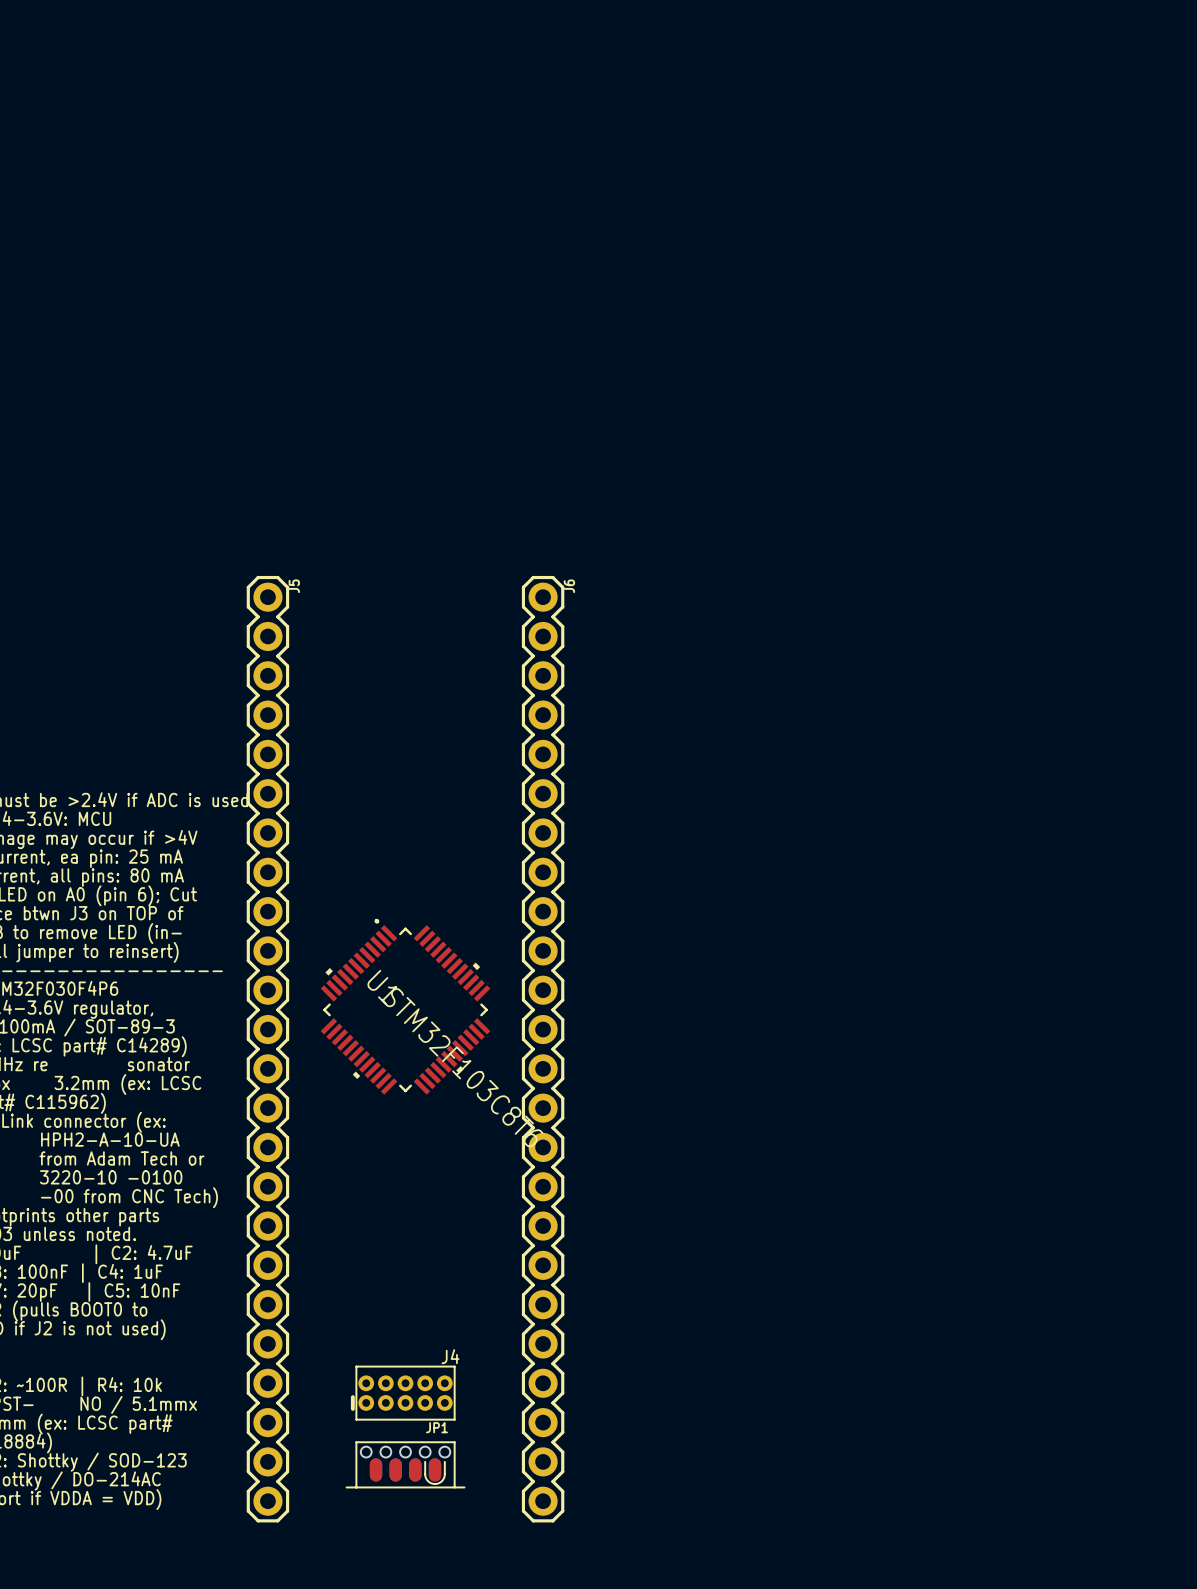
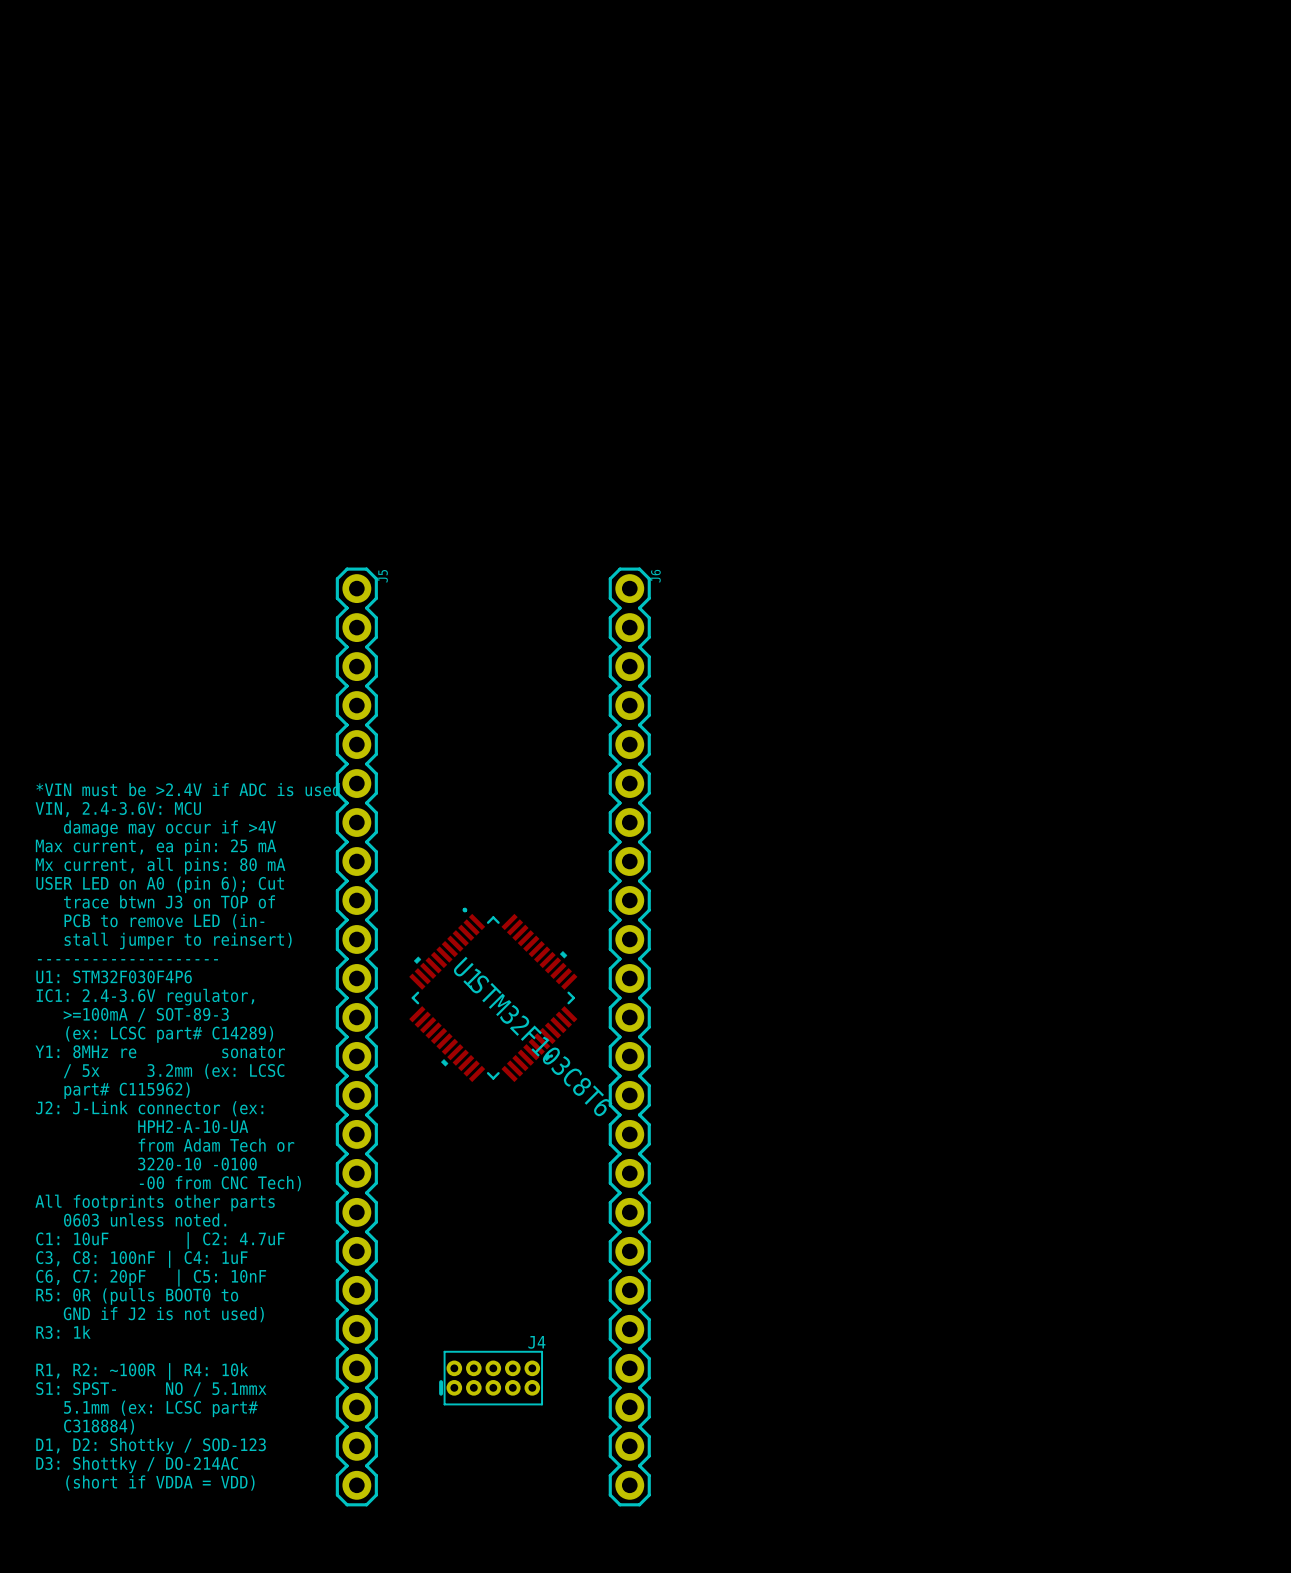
JP1: (405, 1464) -> none

